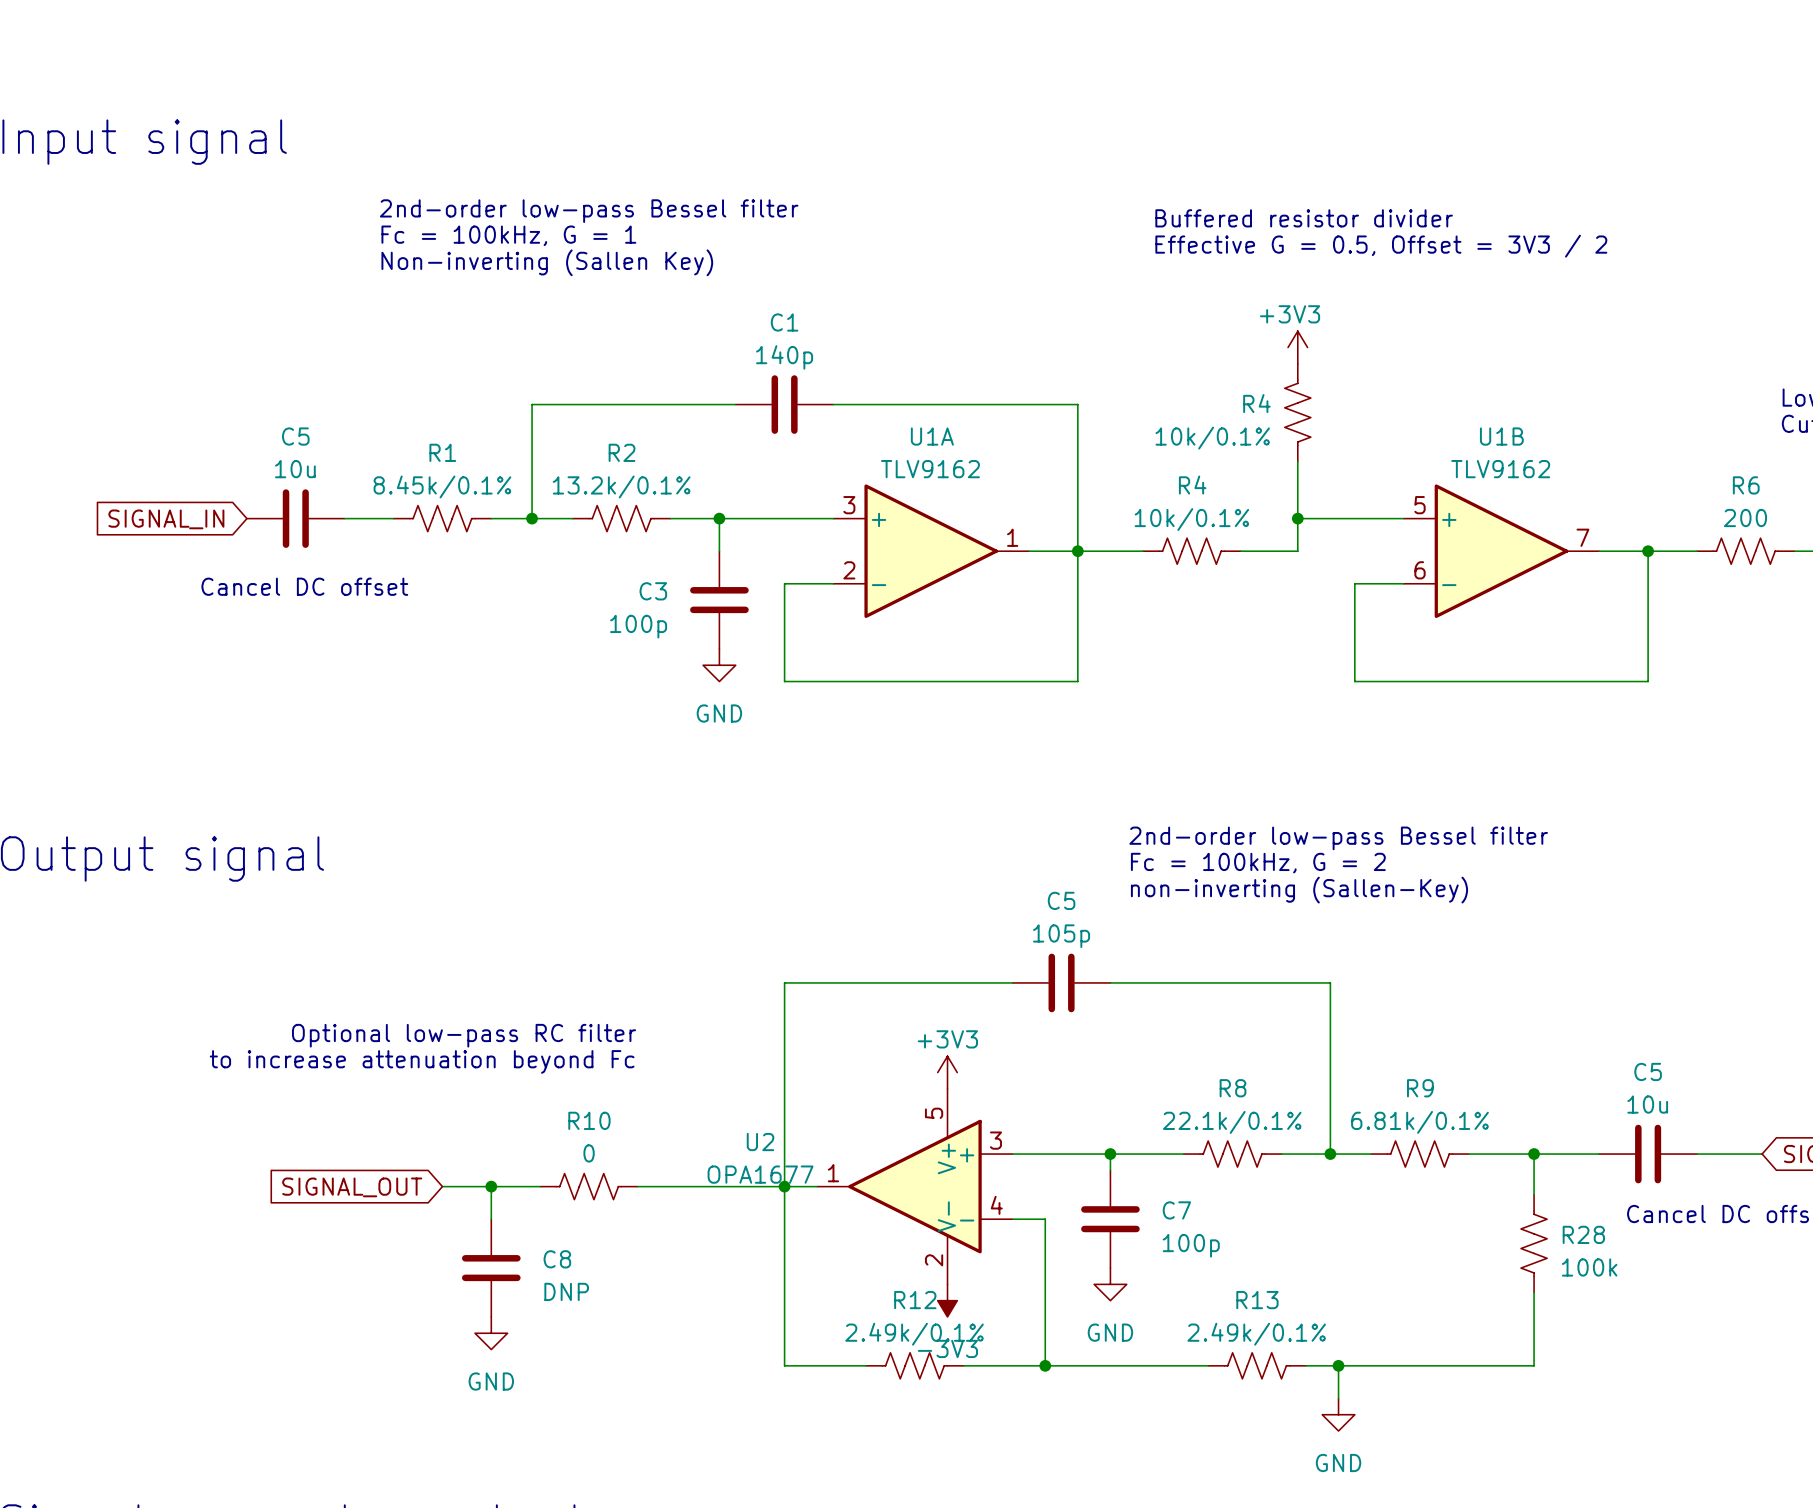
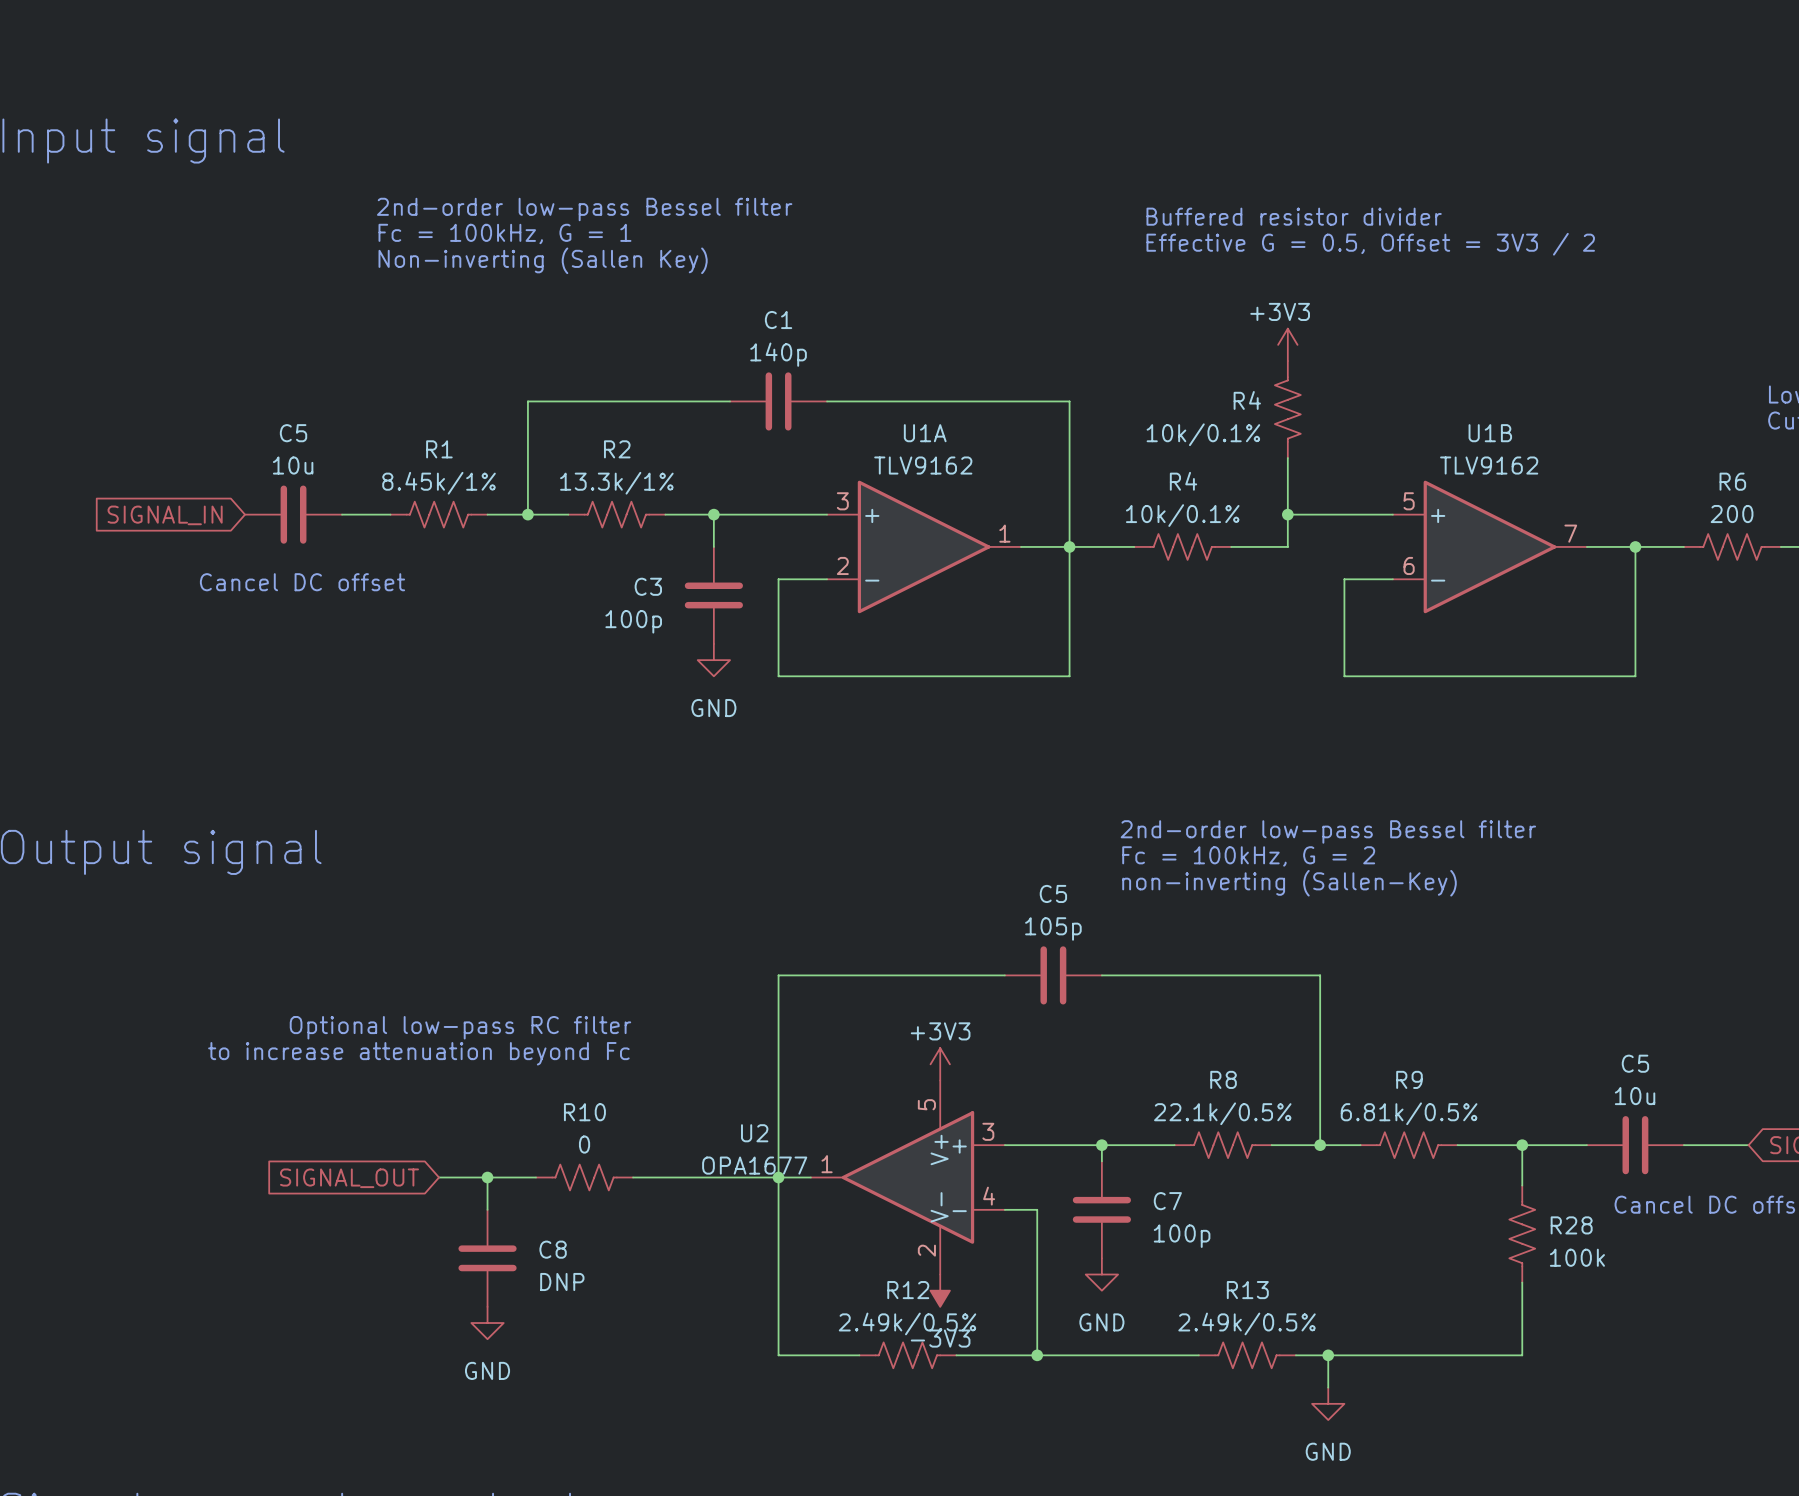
R1 value: 8.45k/0.1% (442, 486) -> 8.45k/1% (439, 483)
R2 value: 13.2k/0.1% (621, 486) -> 13.3k/1% (616, 483)
R8 value: 22.1k/0.1% (1232, 1122) -> 22.1k/0.5% (1222, 1113)
R9 value: 6.81k/0.1% (1420, 1122) -> 6.81k/0.5% (1409, 1113)
R12 value: 2.49k/0.1% (914, 1334) -> 2.49k/0.5% (907, 1323)
R13 value: 2.49k/0.1% (1256, 1334) -> 2.49k/0.5% (1247, 1323)

